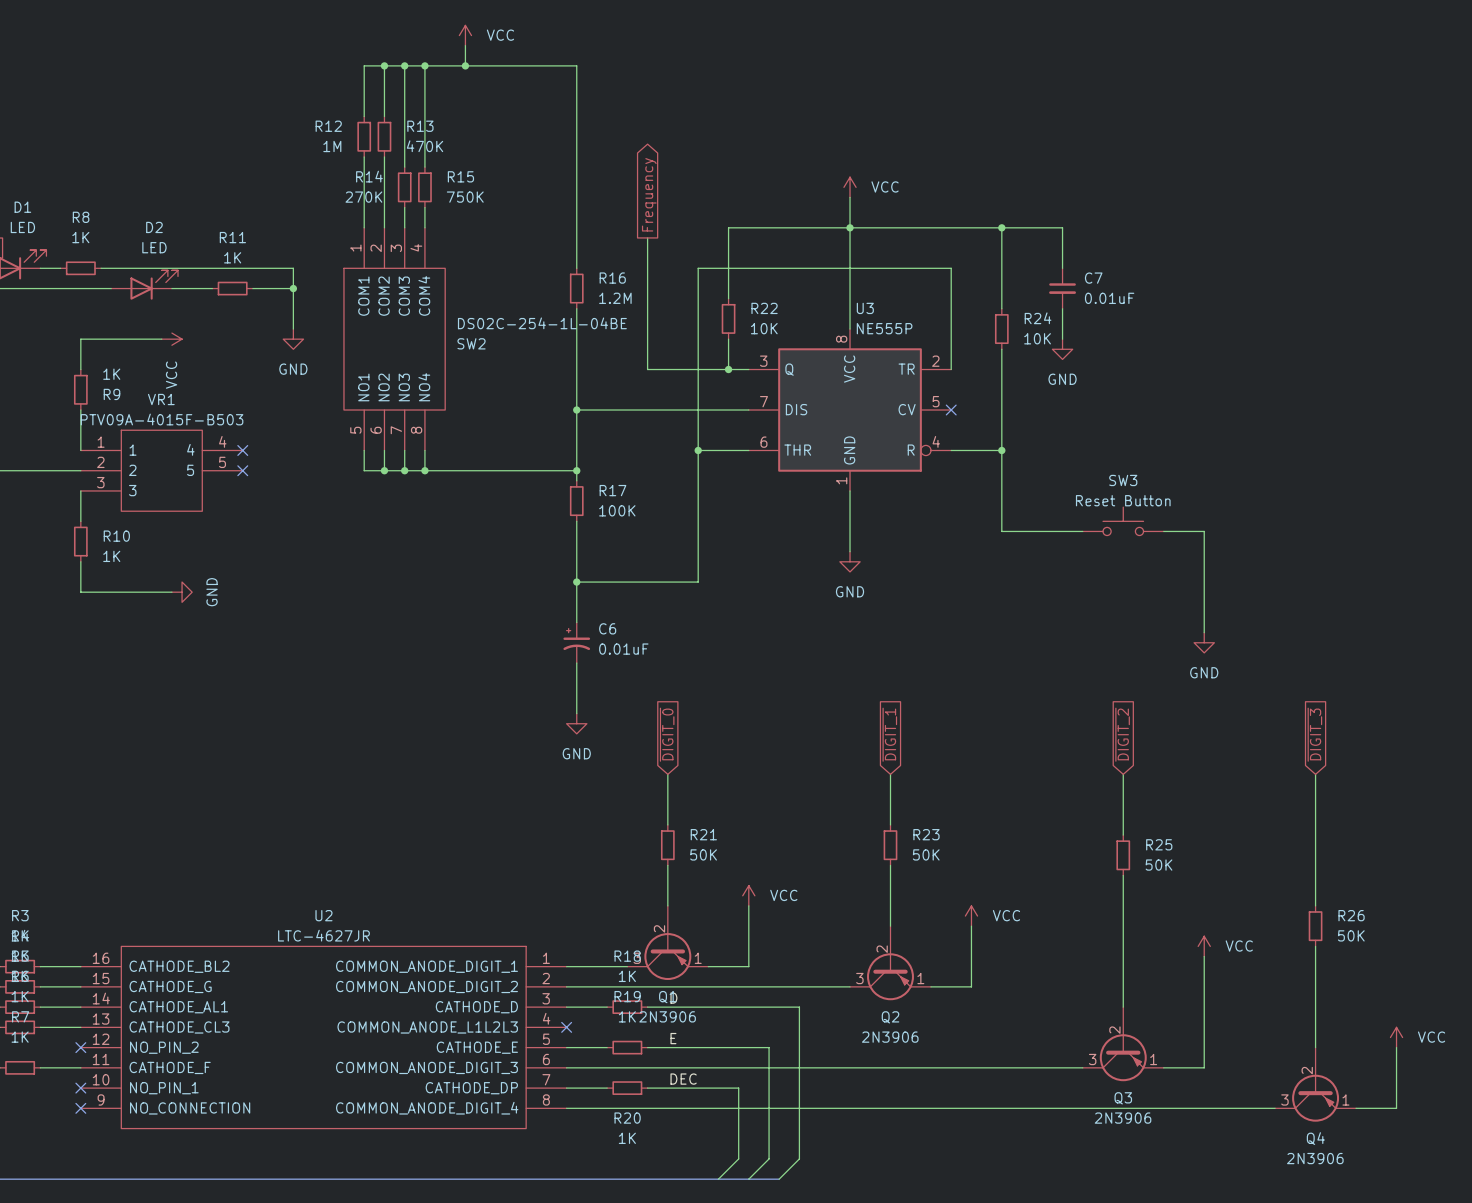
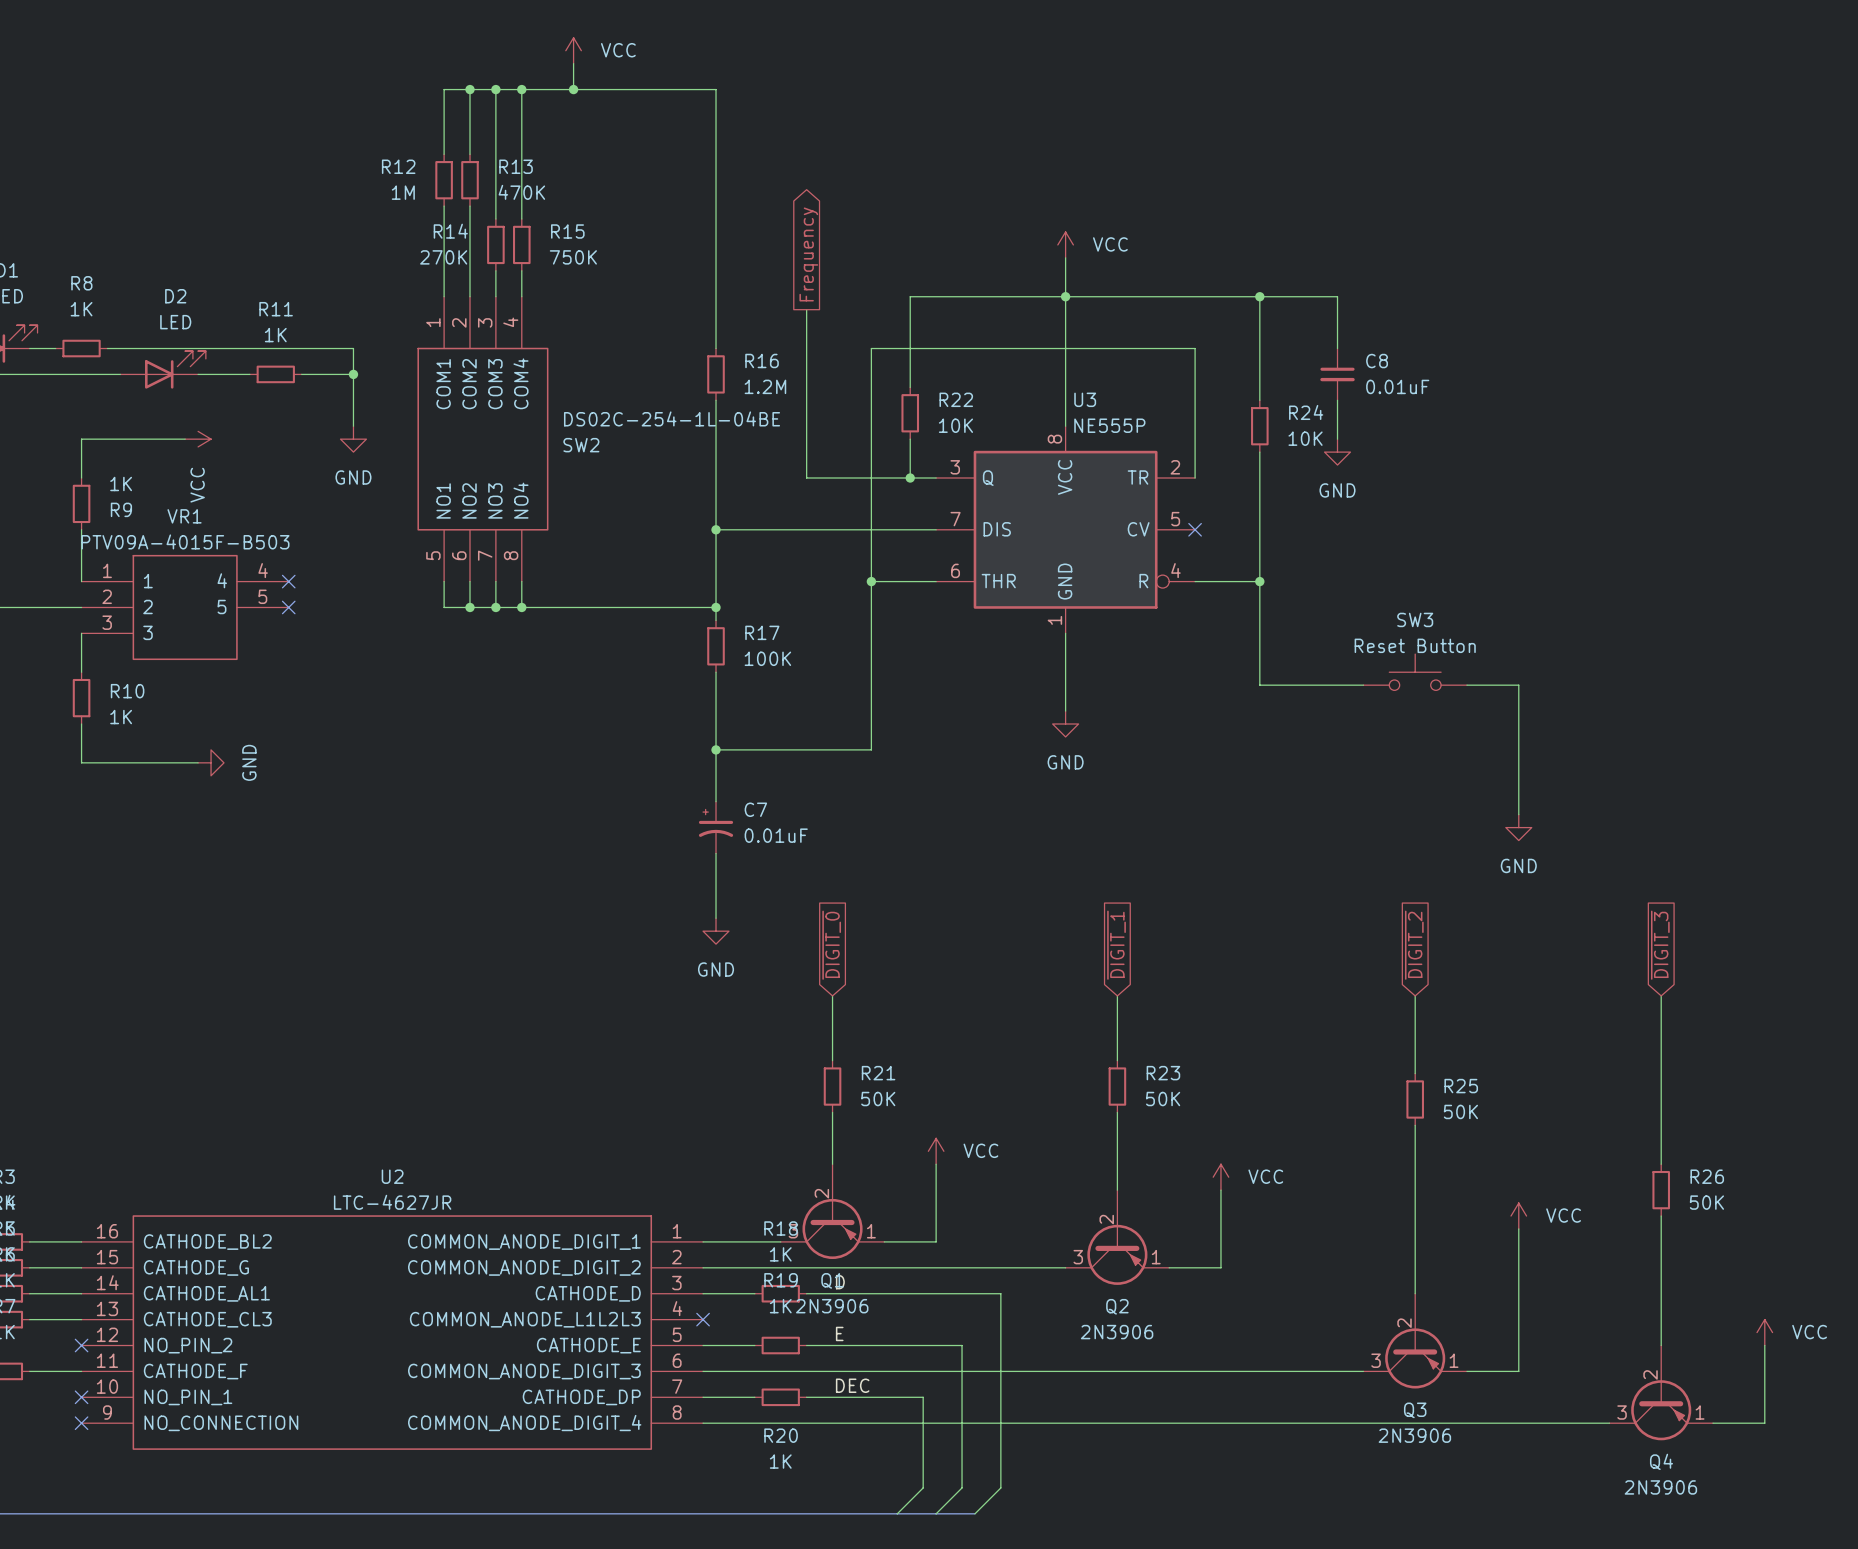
C7 name: C7 (1093, 278) -> C8 (1377, 361)
C6 name: C6 (607, 628) -> C7 (755, 809)

